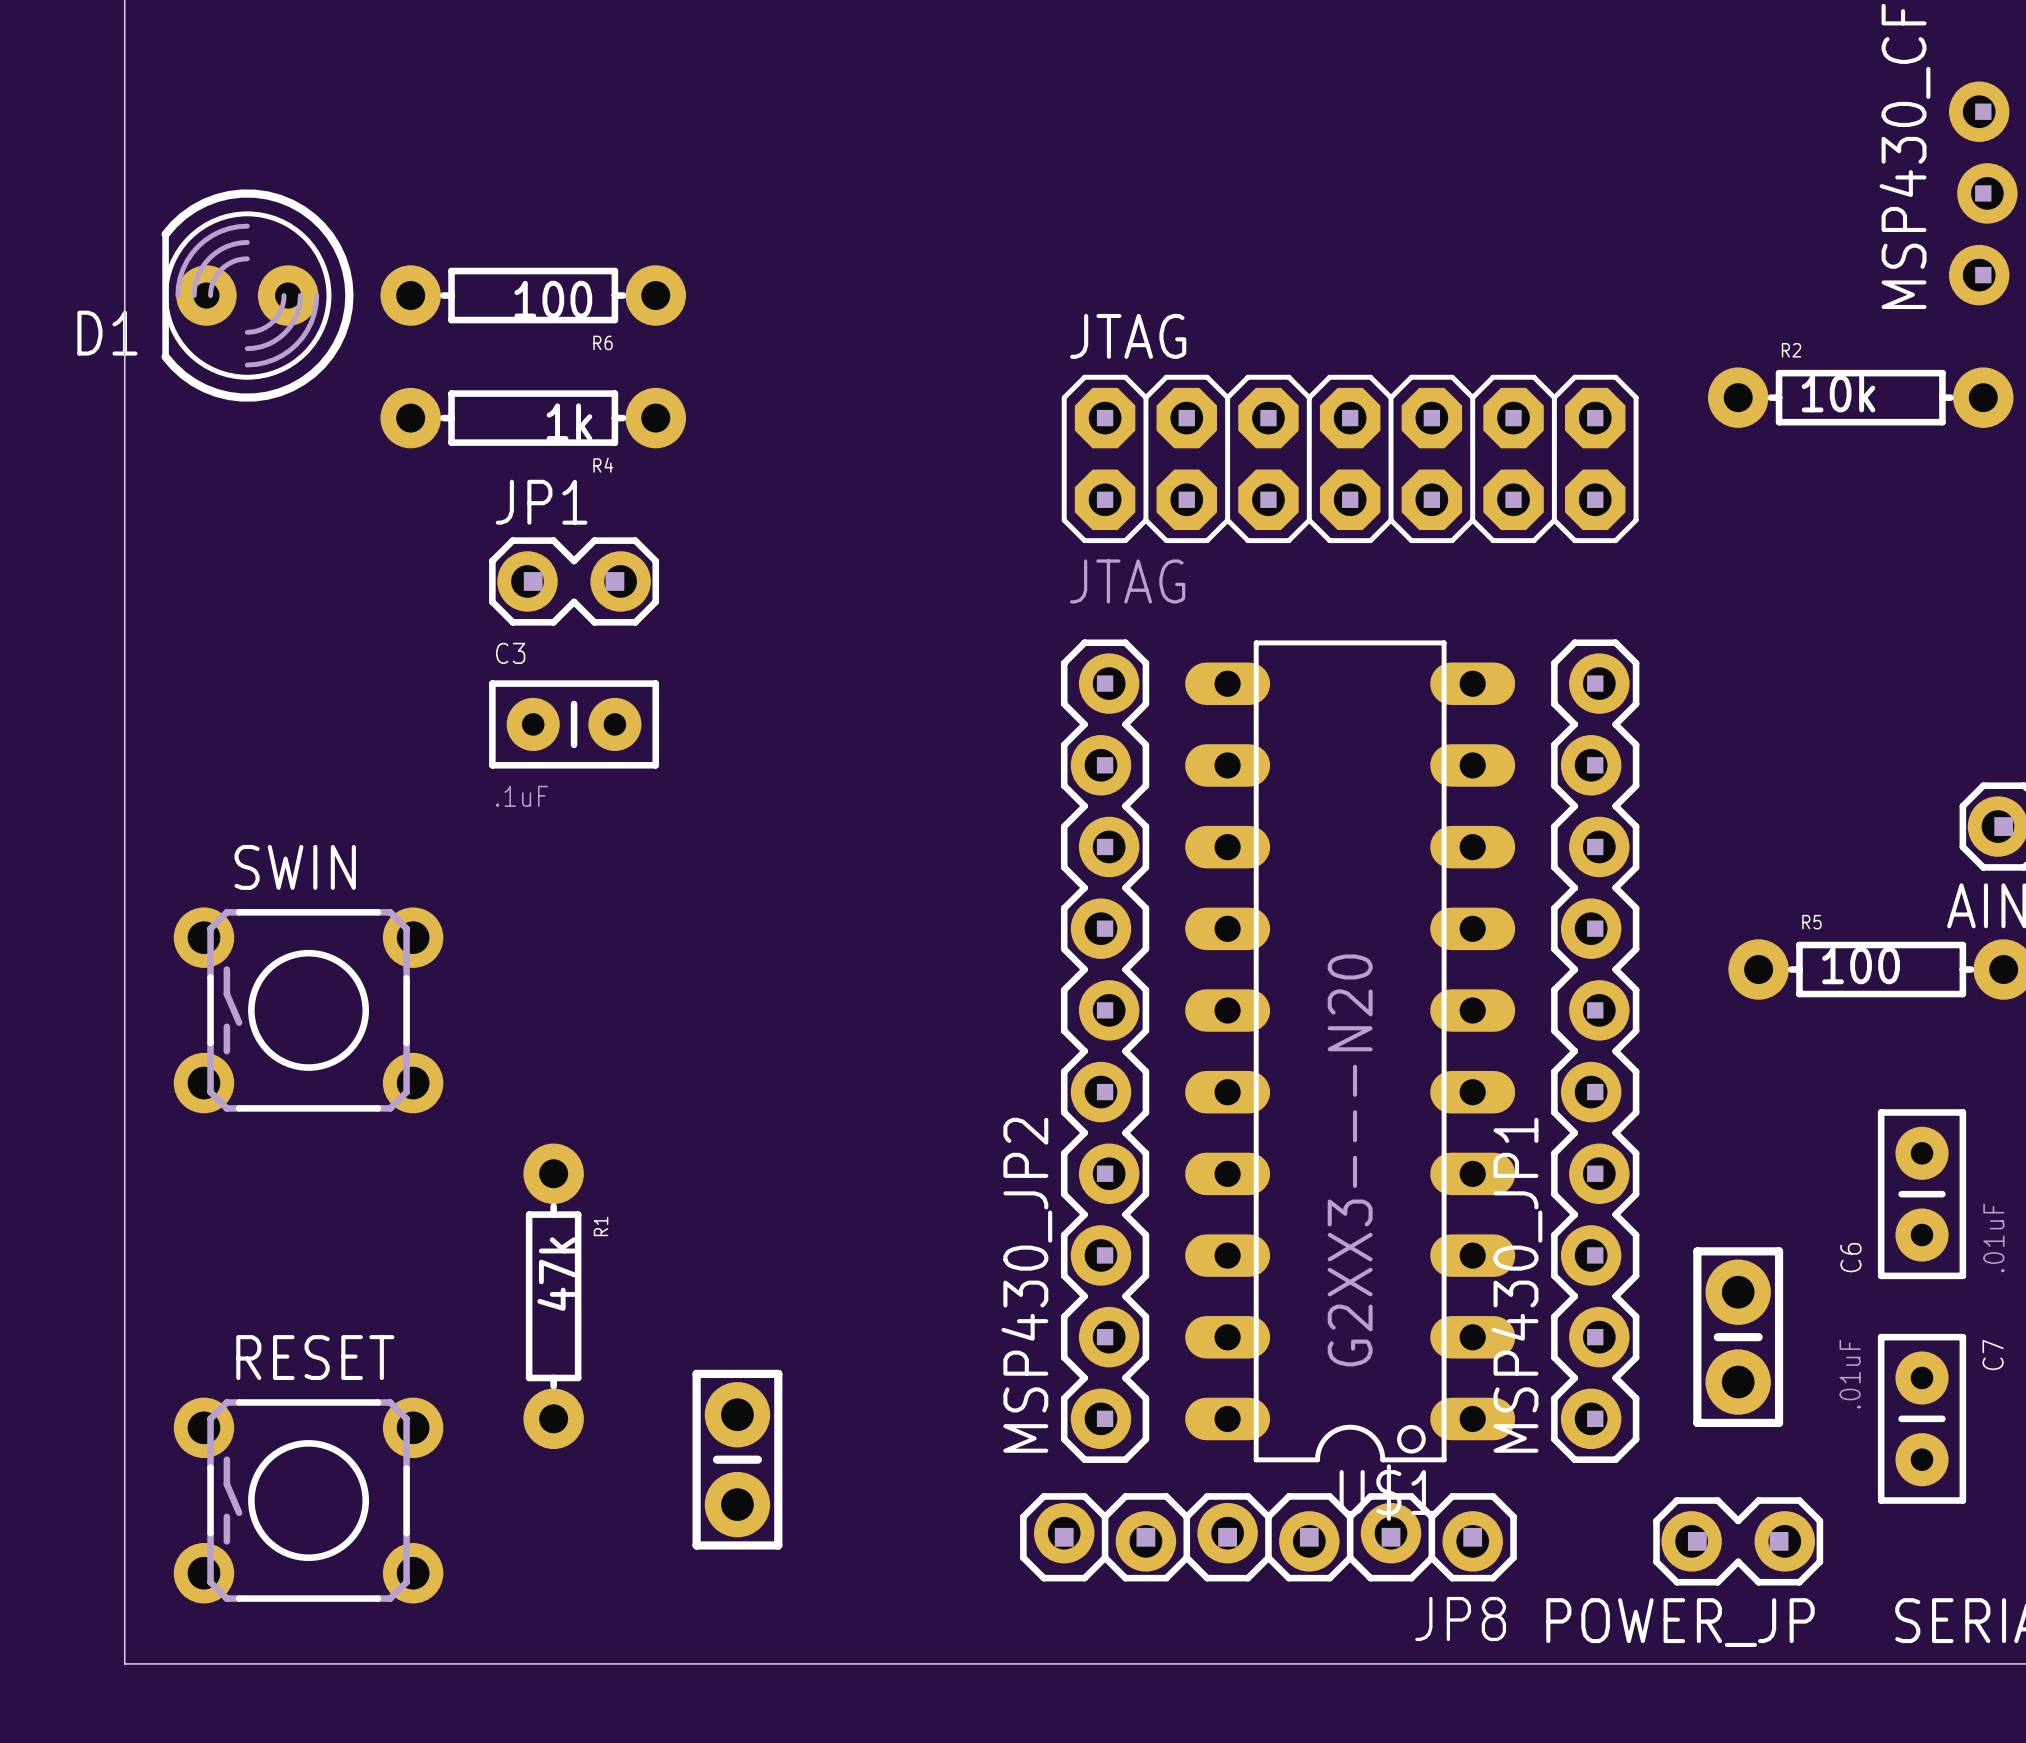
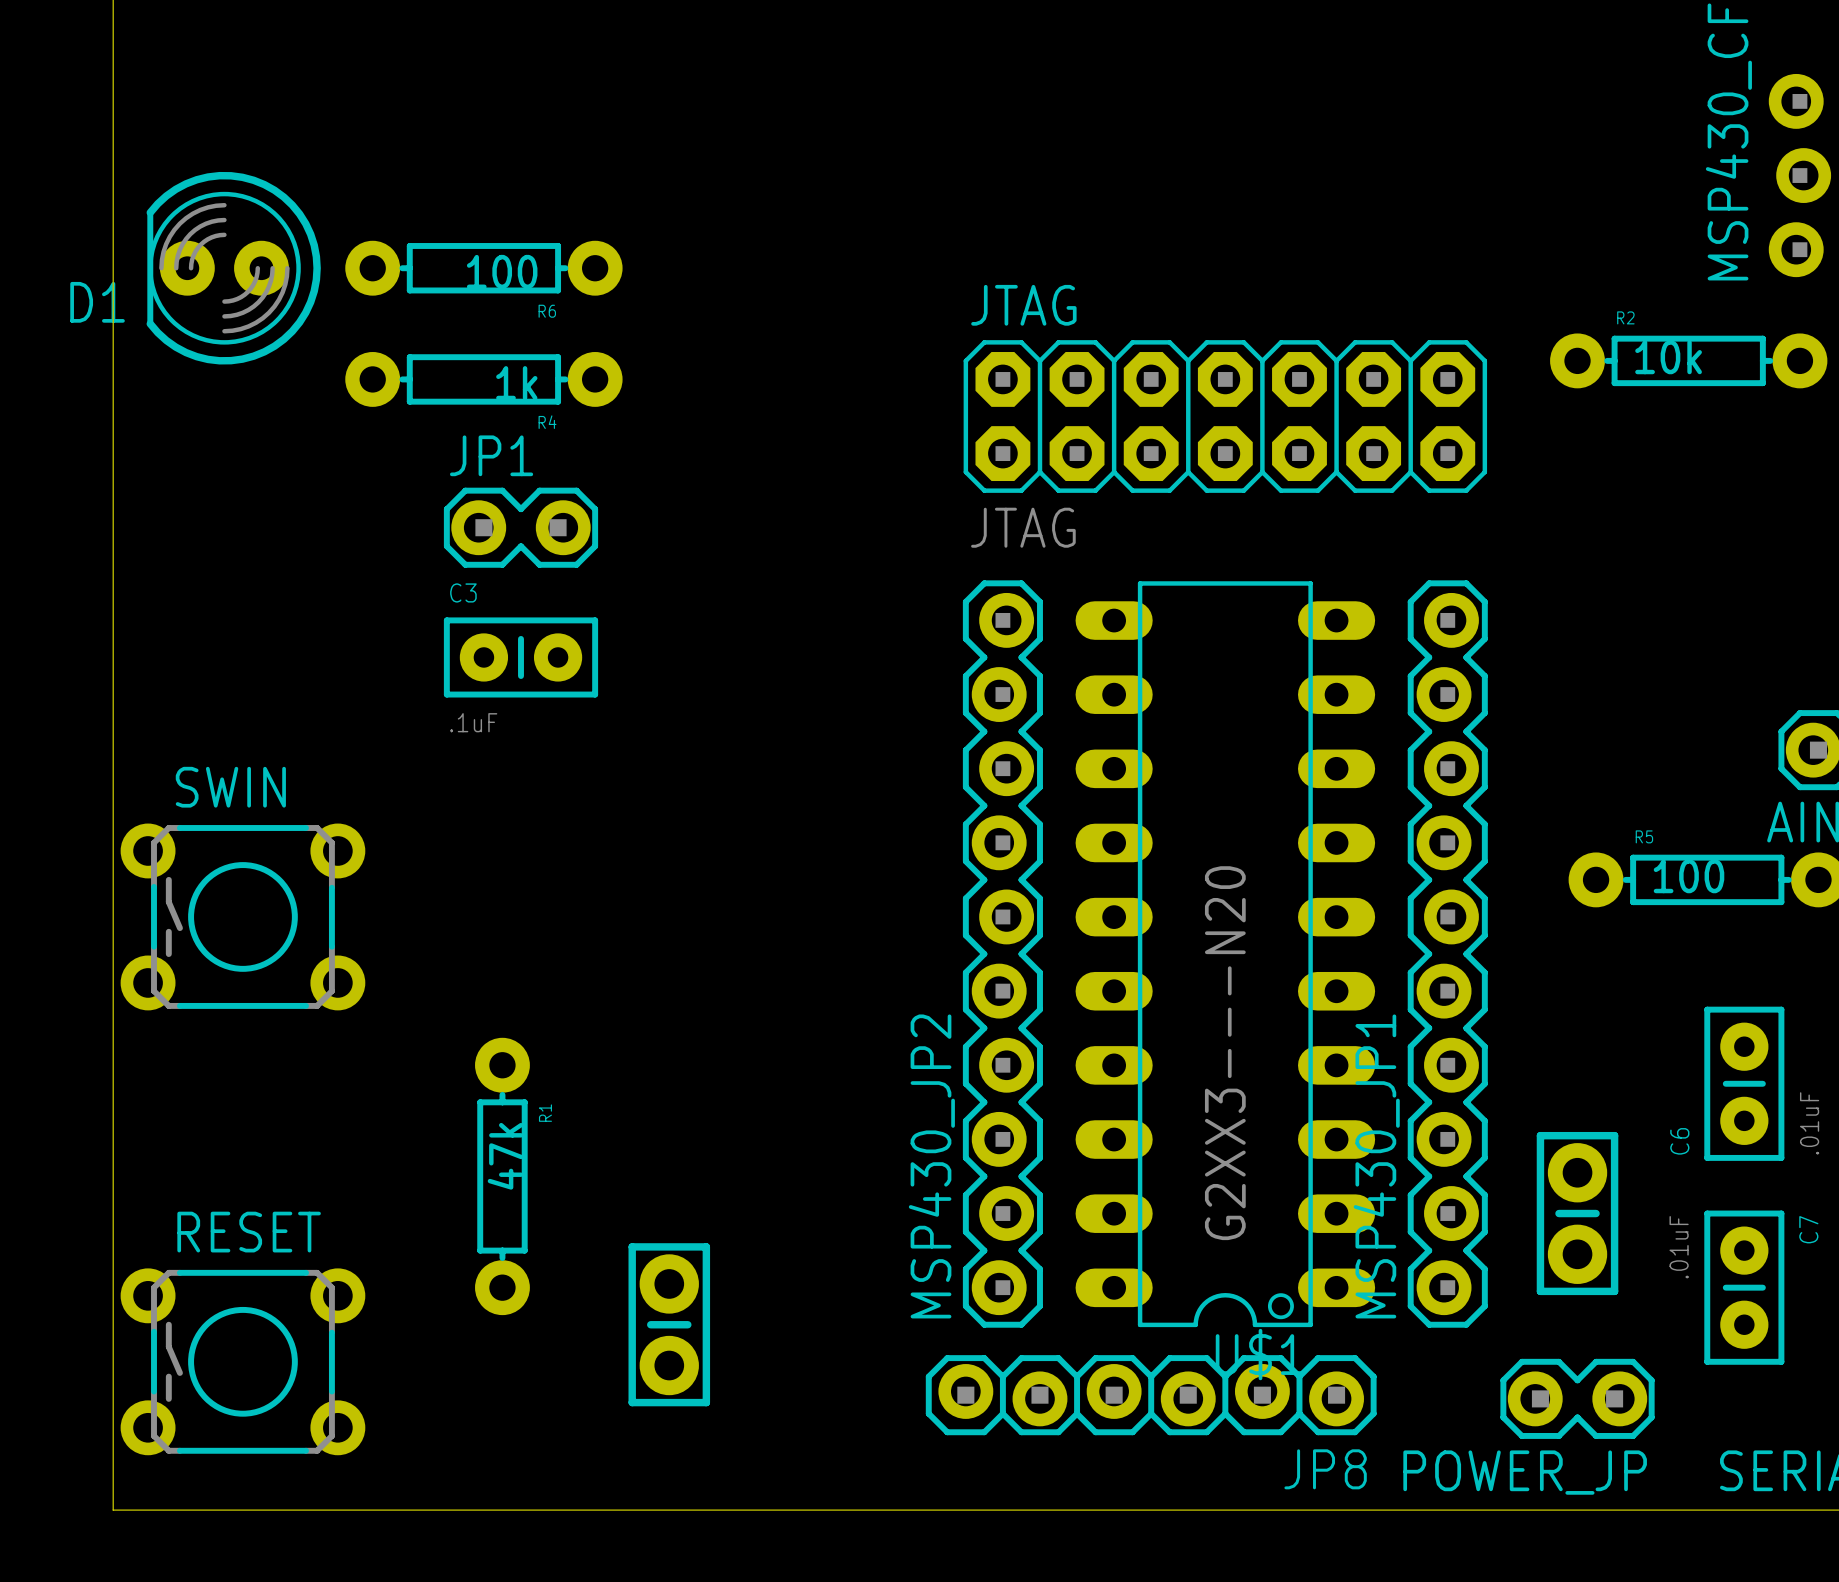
SWIN position: (308, 1010) -> (242, 916)
RESET position: (308, 1500) -> (242, 1361)

